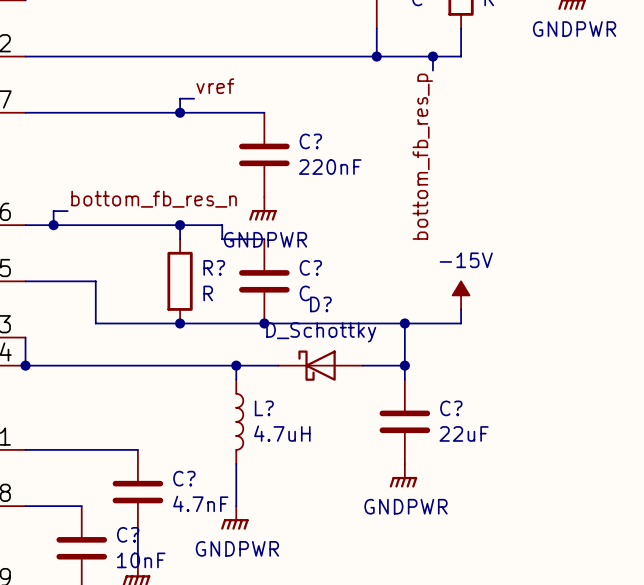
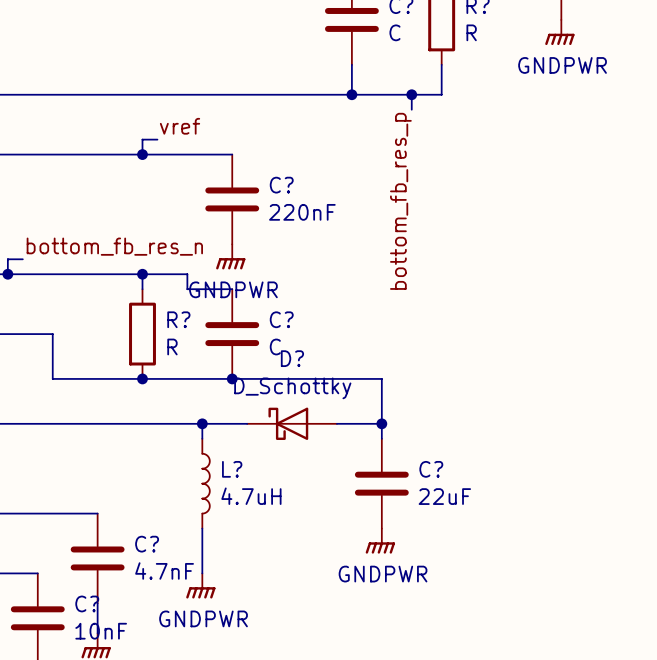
power symbol: -15V (461, 295) -> none
wire: (461, 309) (461, 323) (404, 323) -> none
junction: (404, 323) -> none

